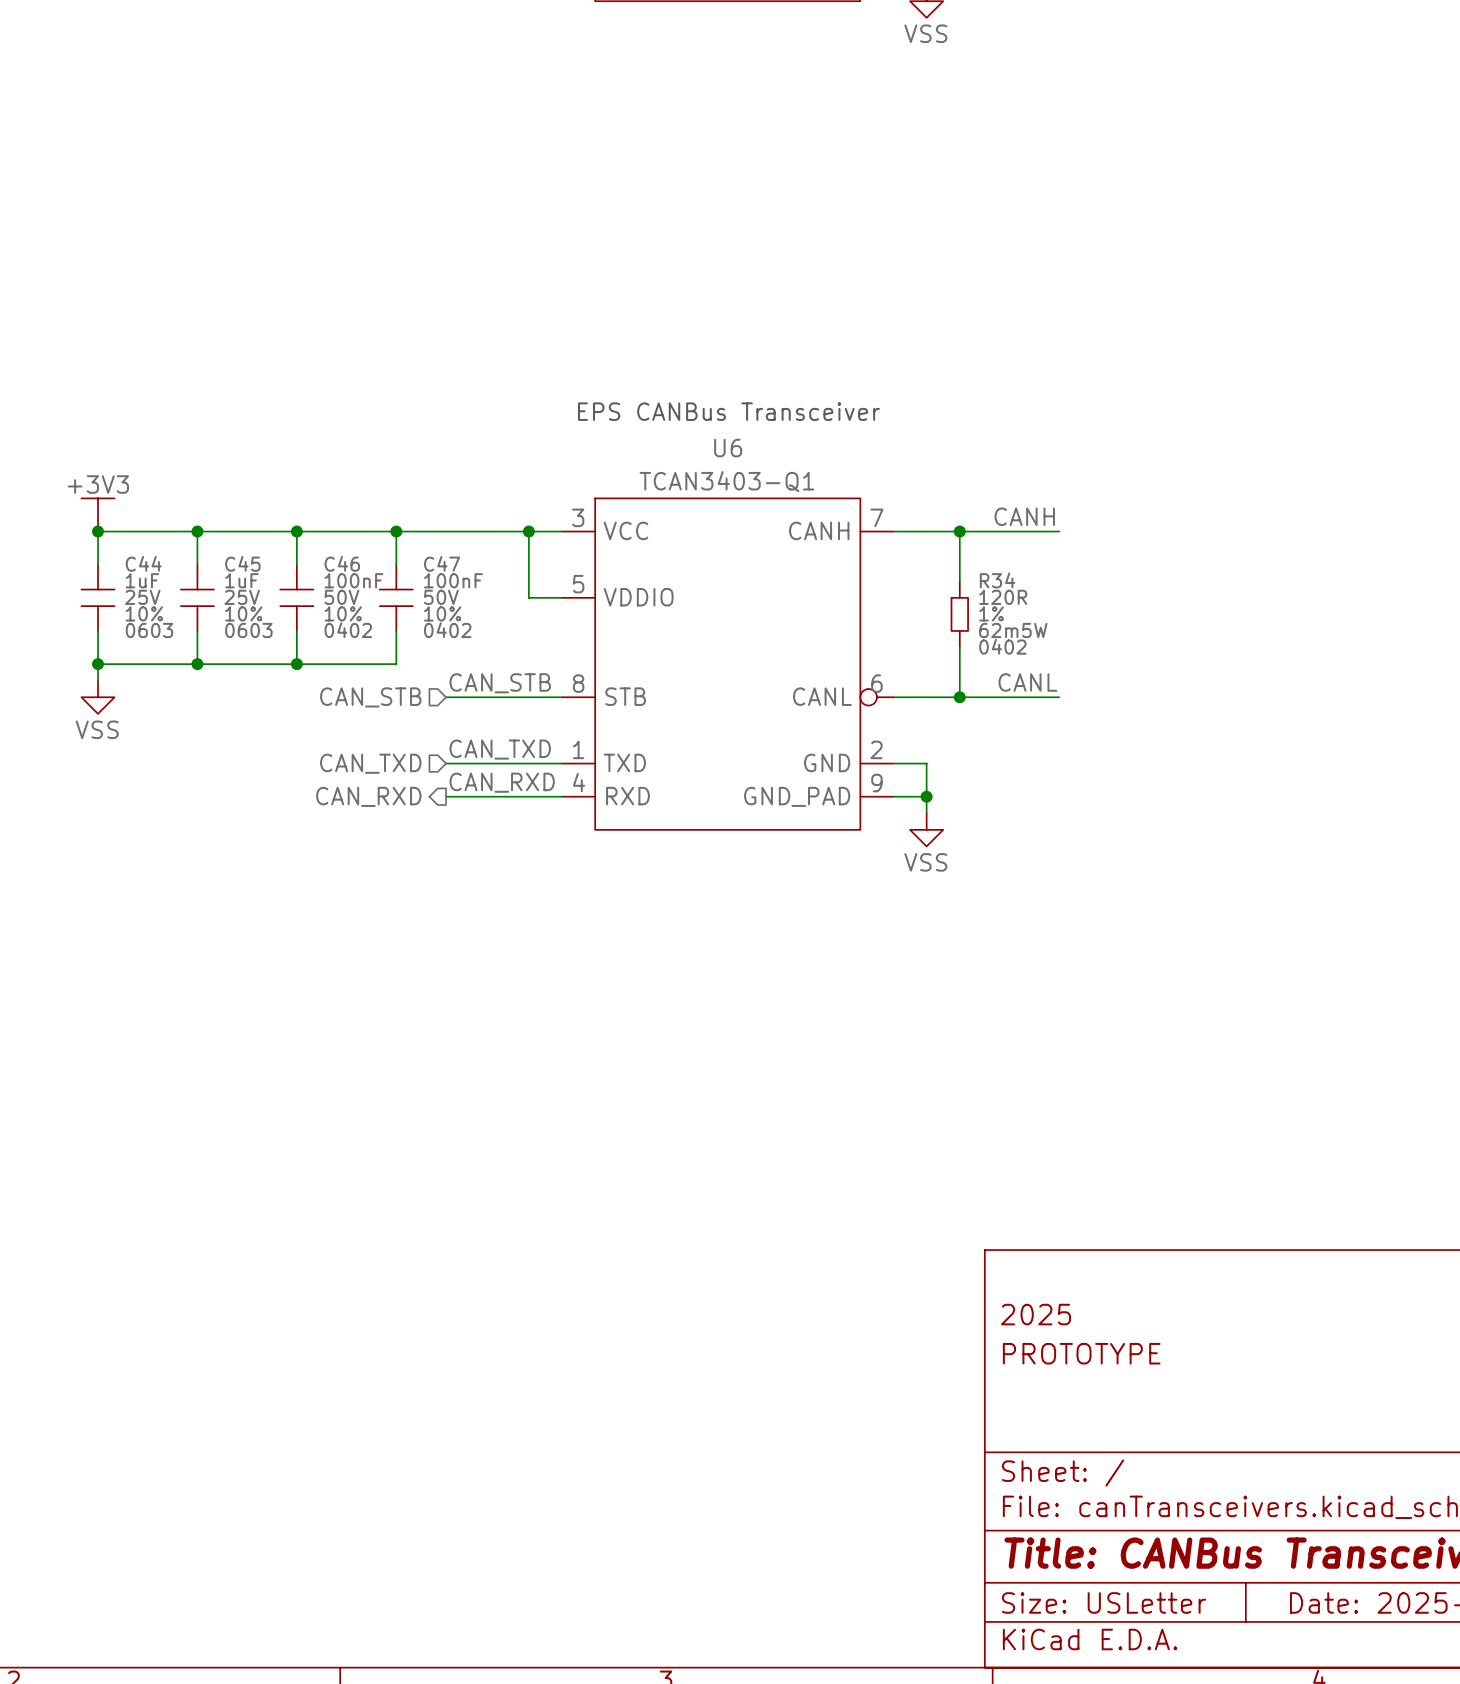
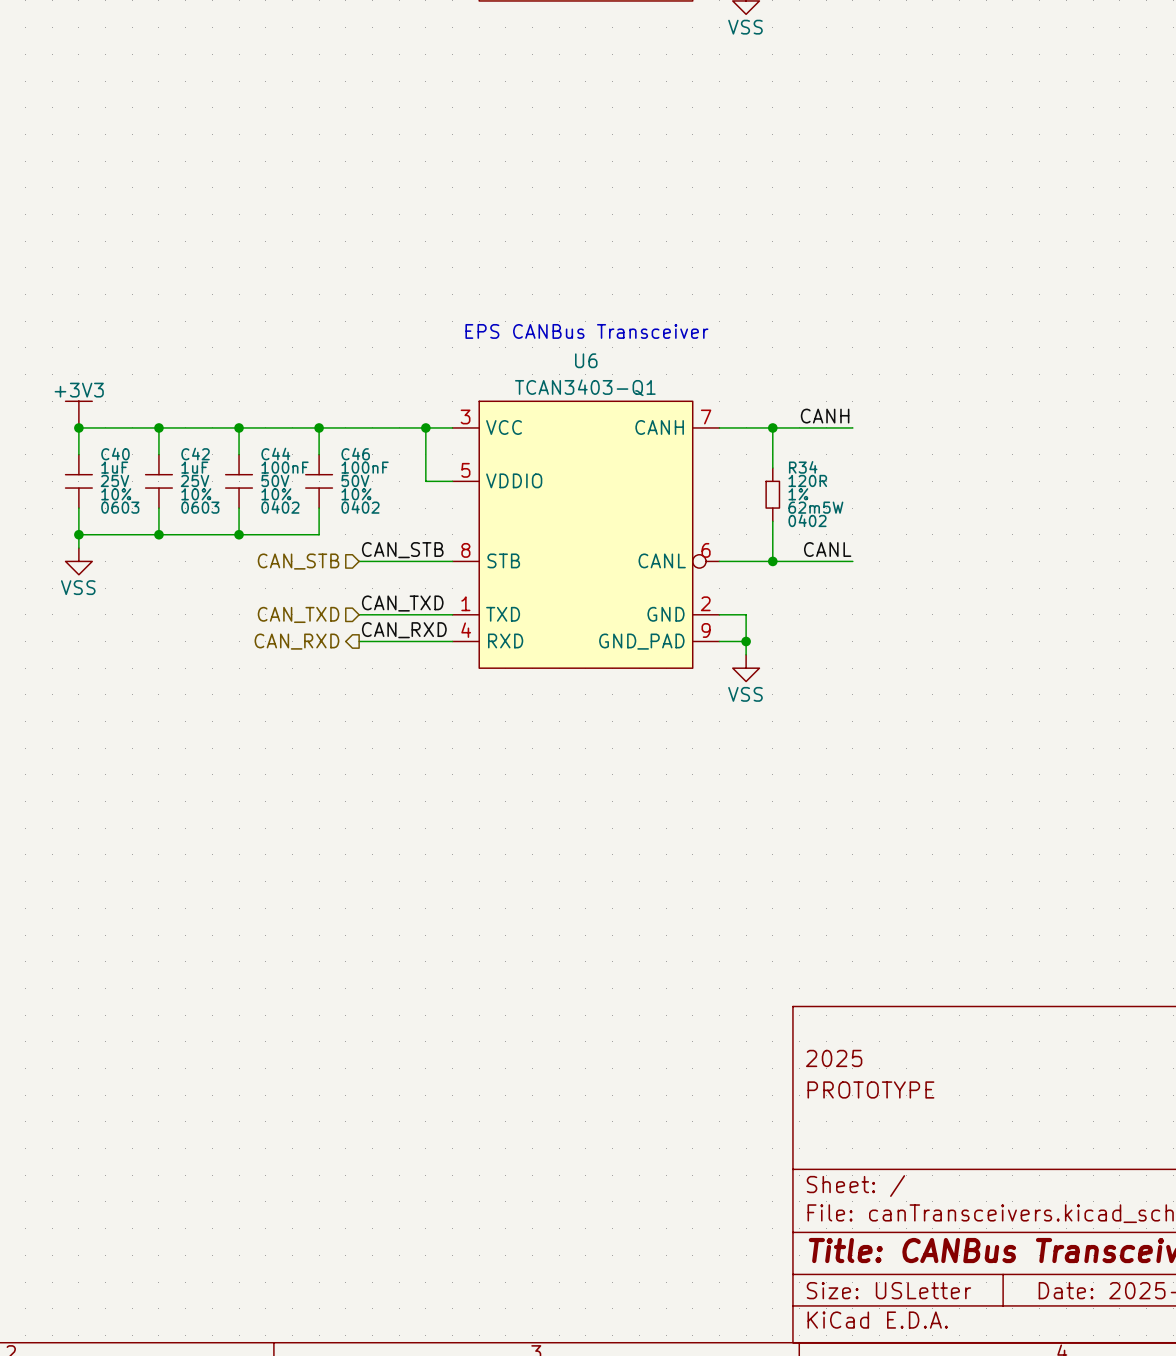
C44 name: C44 (143, 563) -> C40 (115, 454)
C45 name: C45 (242, 563) -> C42 (195, 454)
C46 name: C46 (342, 563) -> C44 (275, 454)
C47 name: C47 (442, 563) -> C46 (355, 454)

